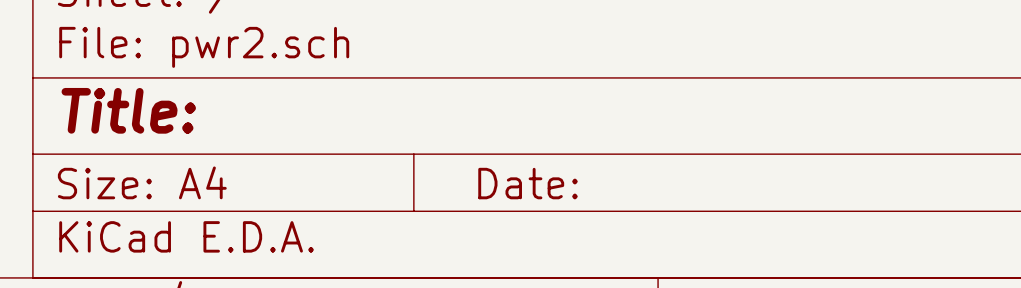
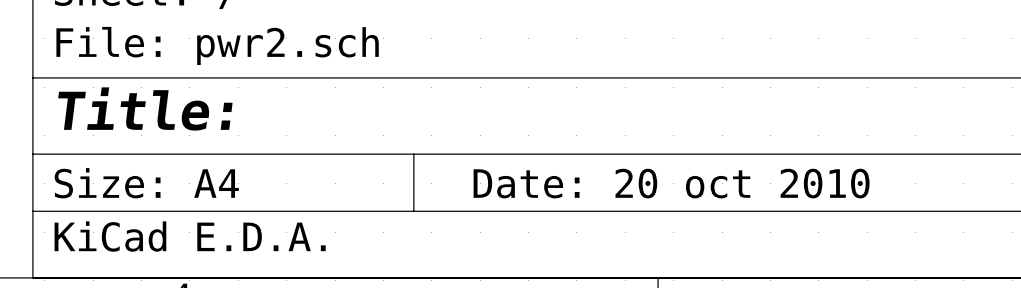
title block: Date: (528, 183) -> Date: 20 oct 2010 (671, 183)

